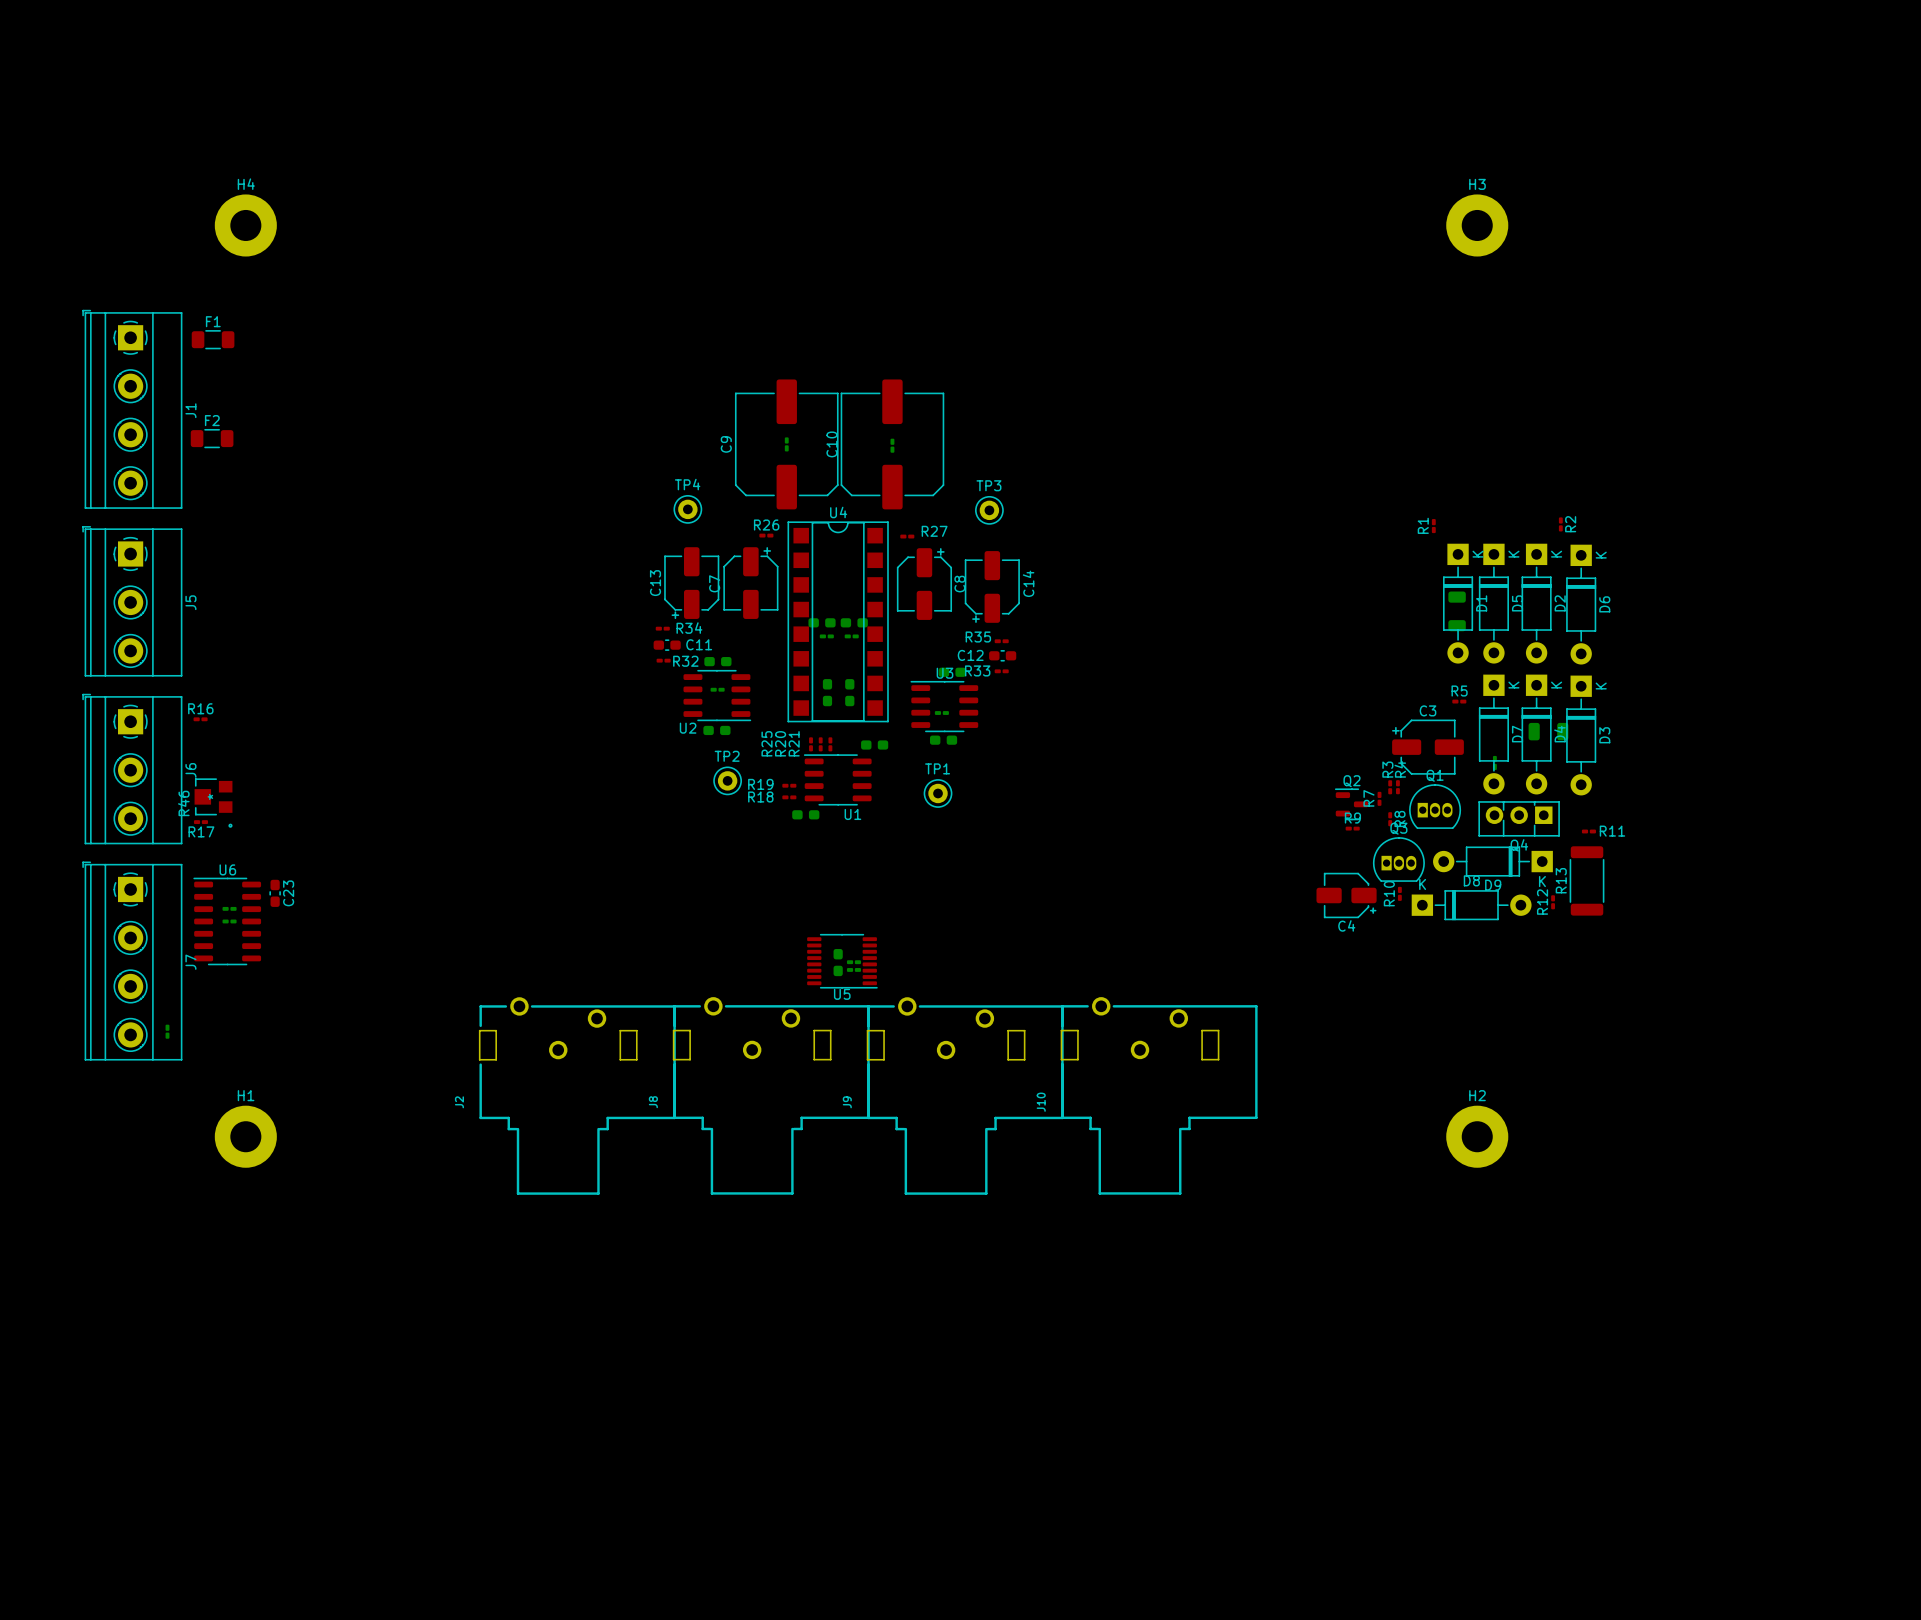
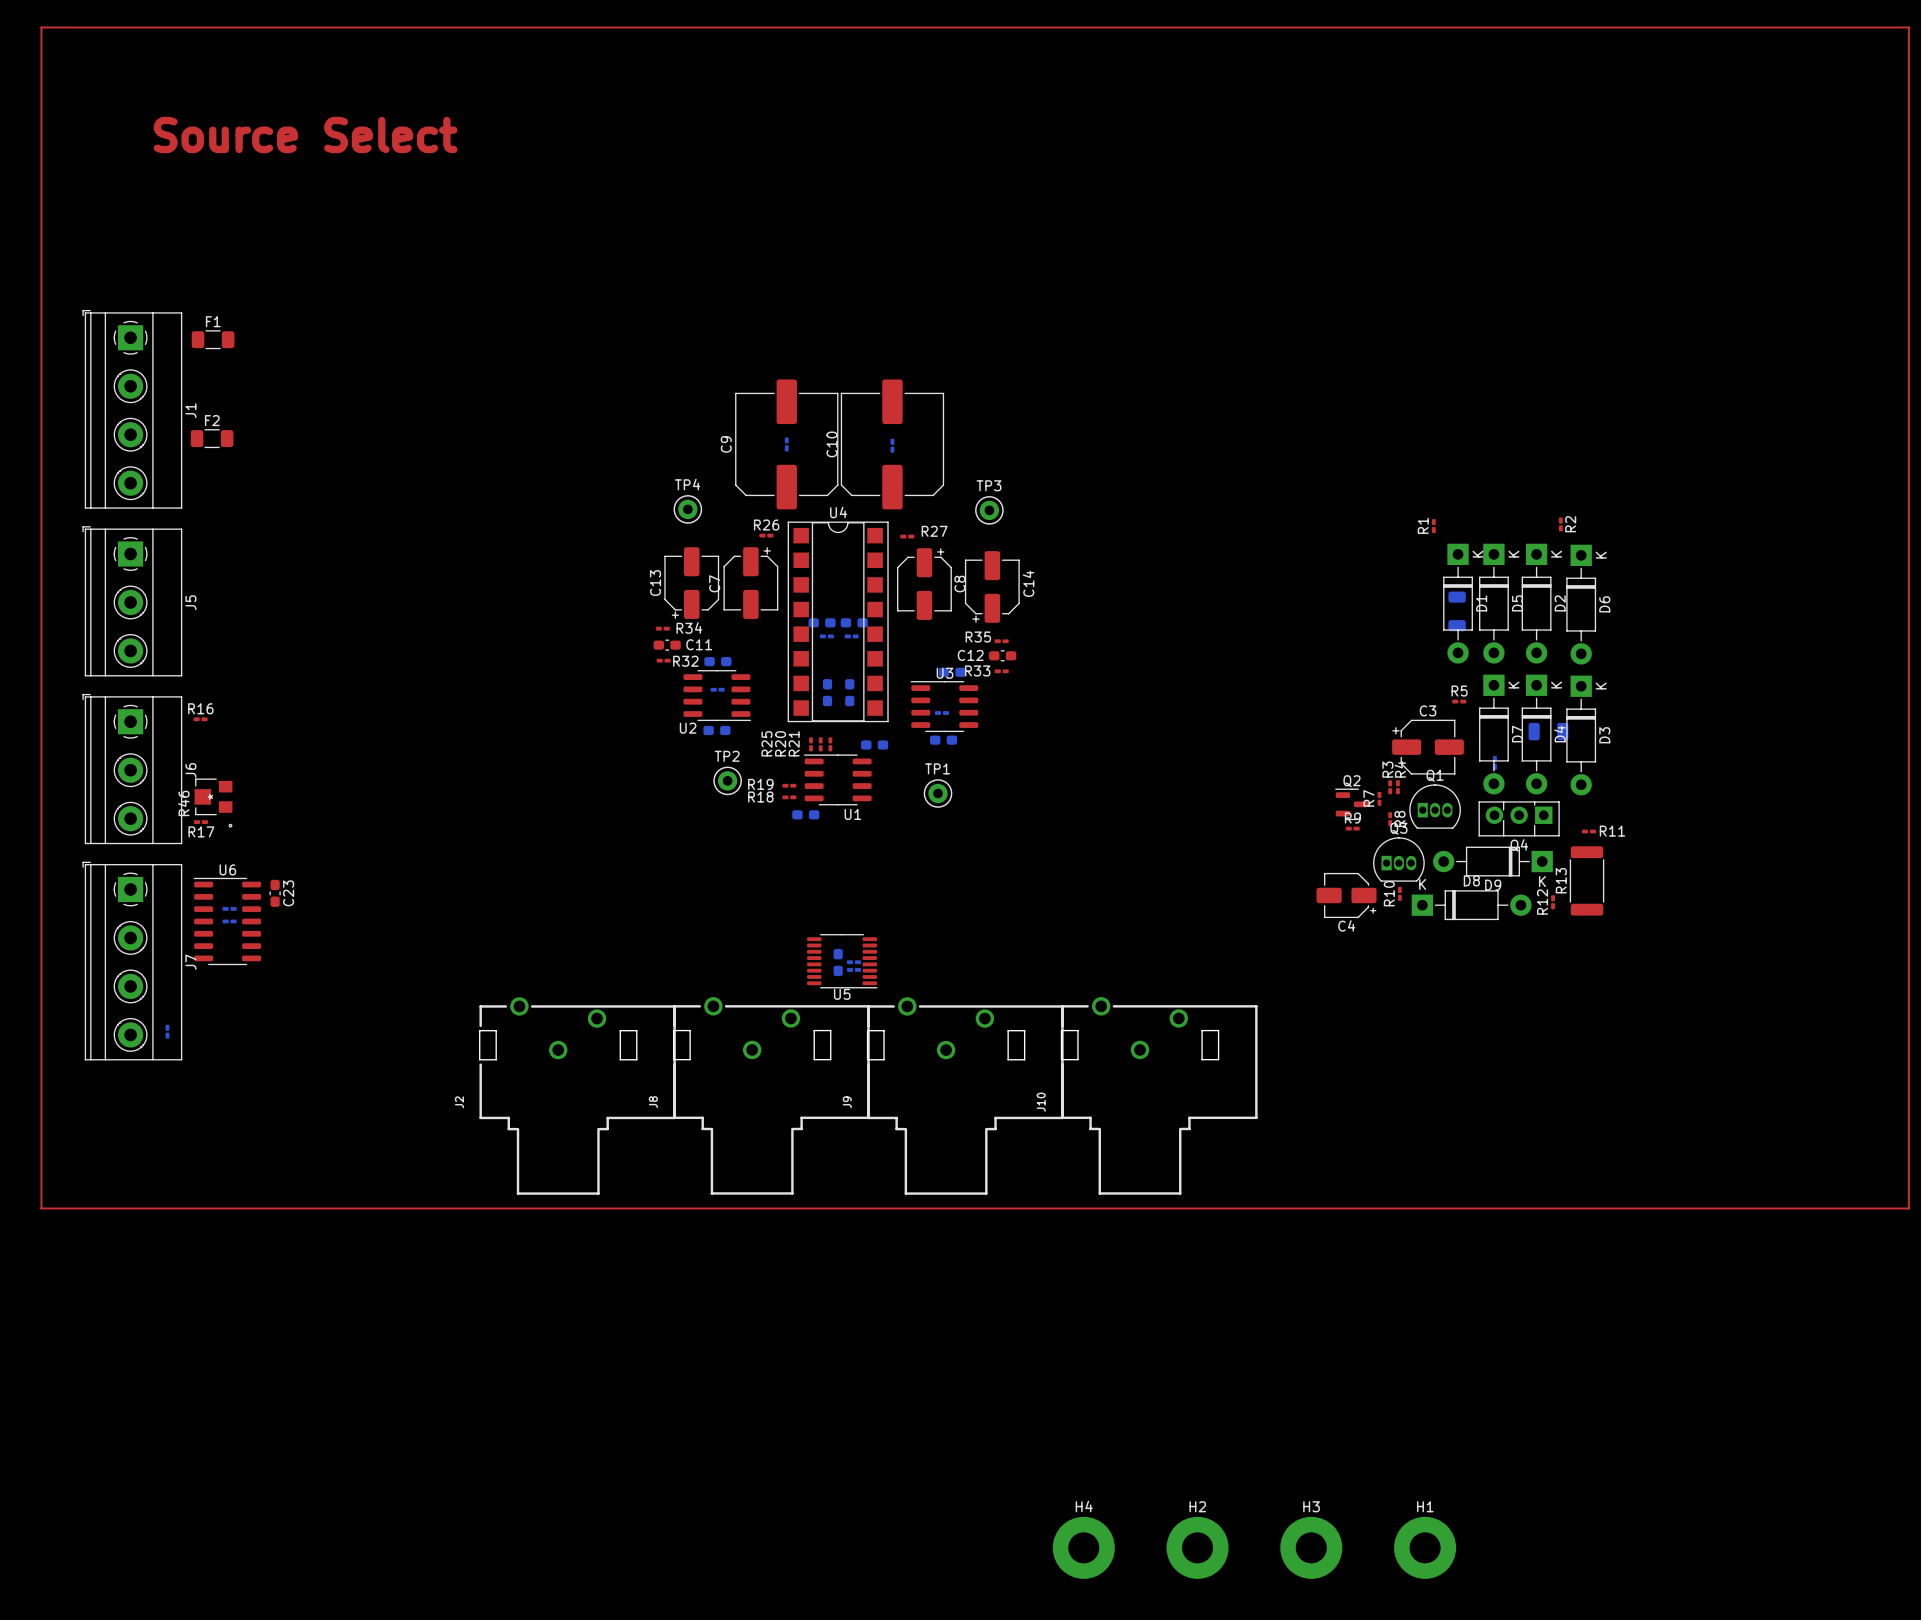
top track: none -> (41, 27) (1908, 27) (1908, 1208) (41, 1208) (41, 27)
text: none -> Source Select (305, 135)
H4 position: (245, 225) -> (1083, 1547)
H3 position: (1477, 225) -> (1311, 1547)
H1 position: (245, 1136) -> (1425, 1547)
H2 position: (1477, 1136) -> (1197, 1547)

